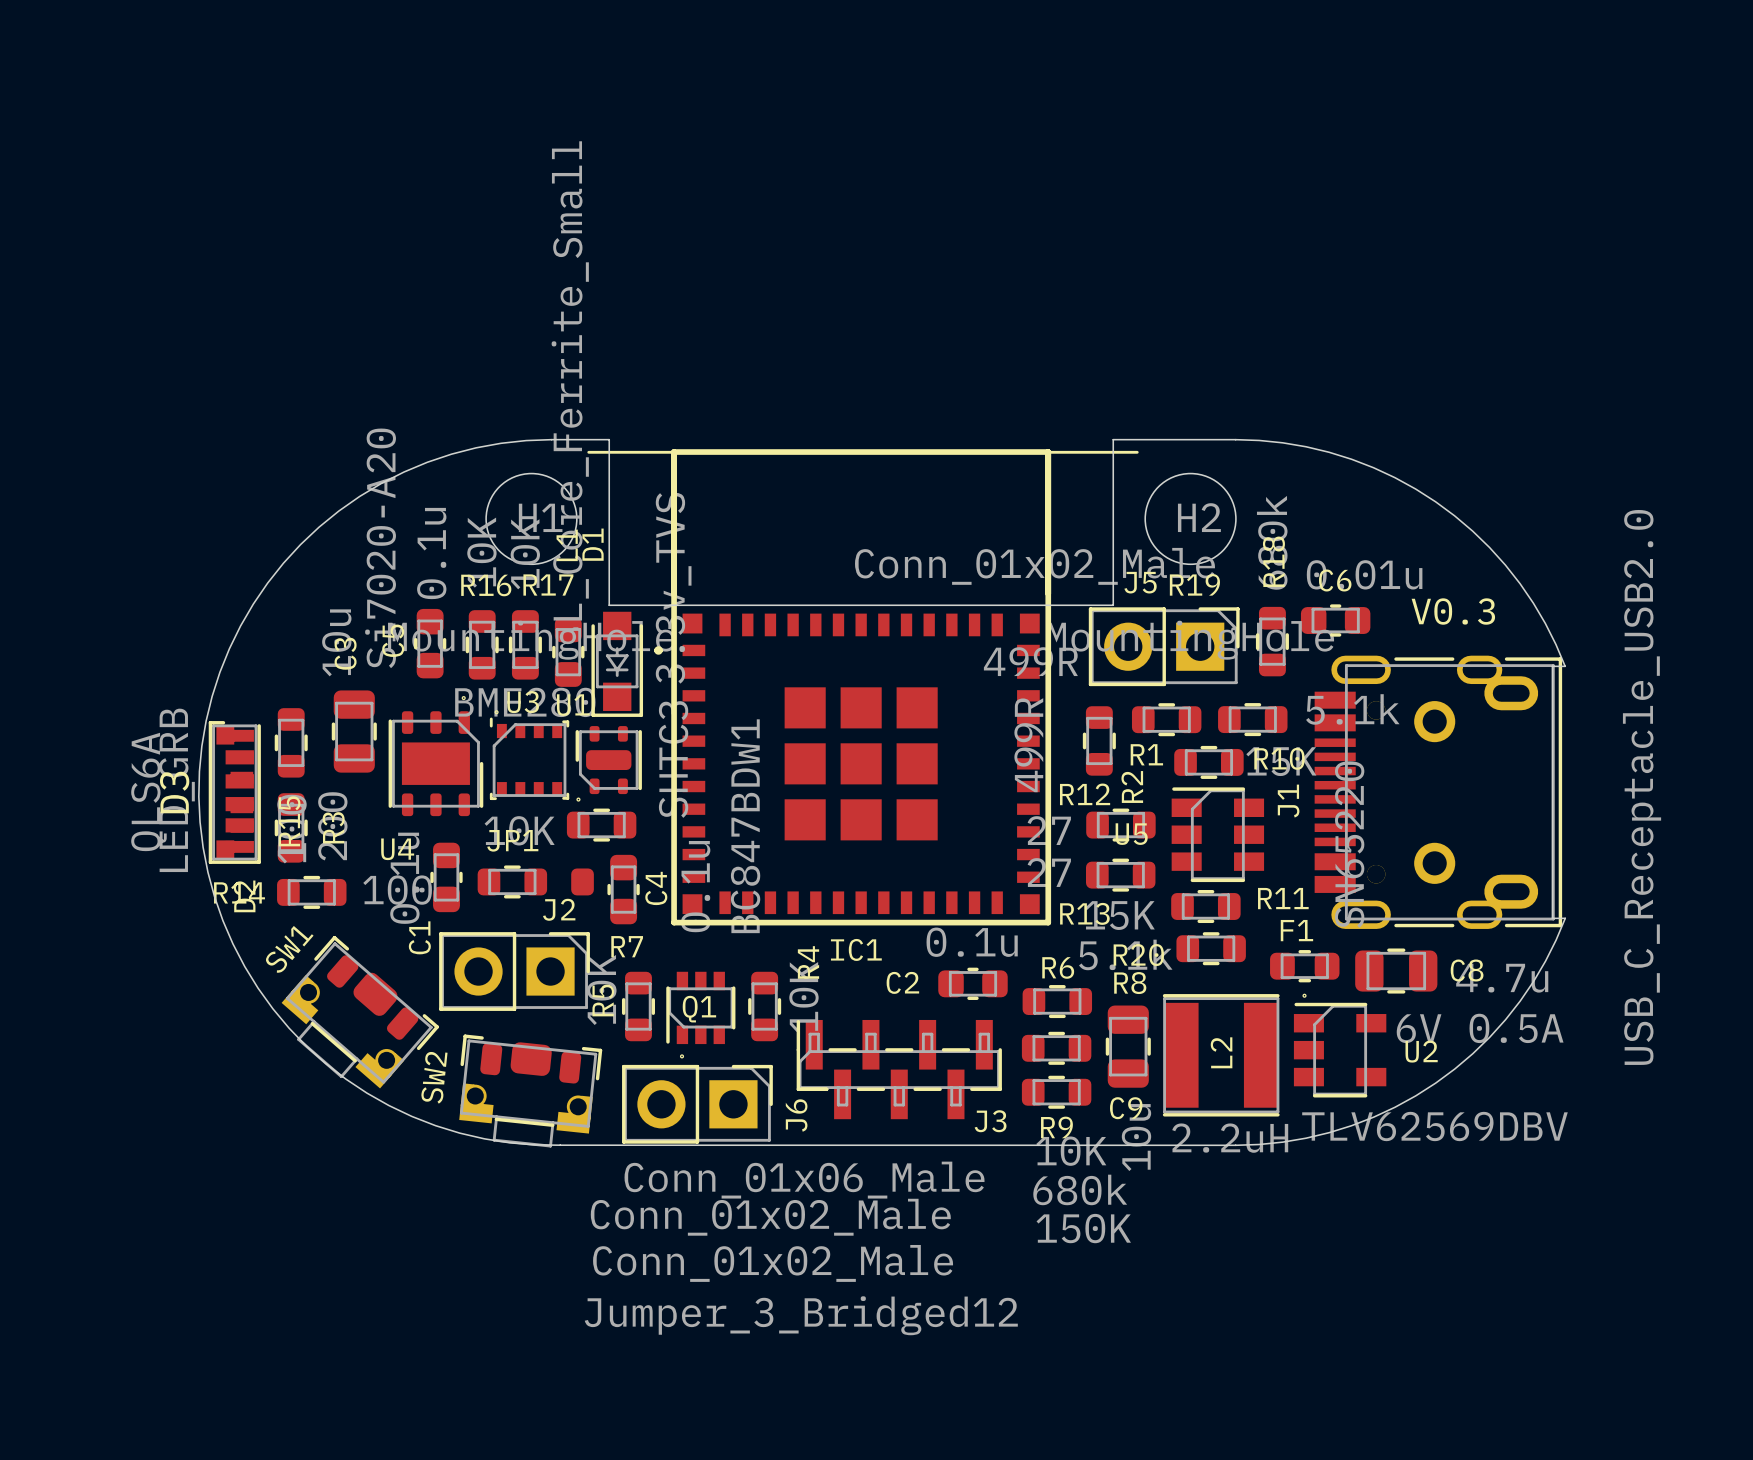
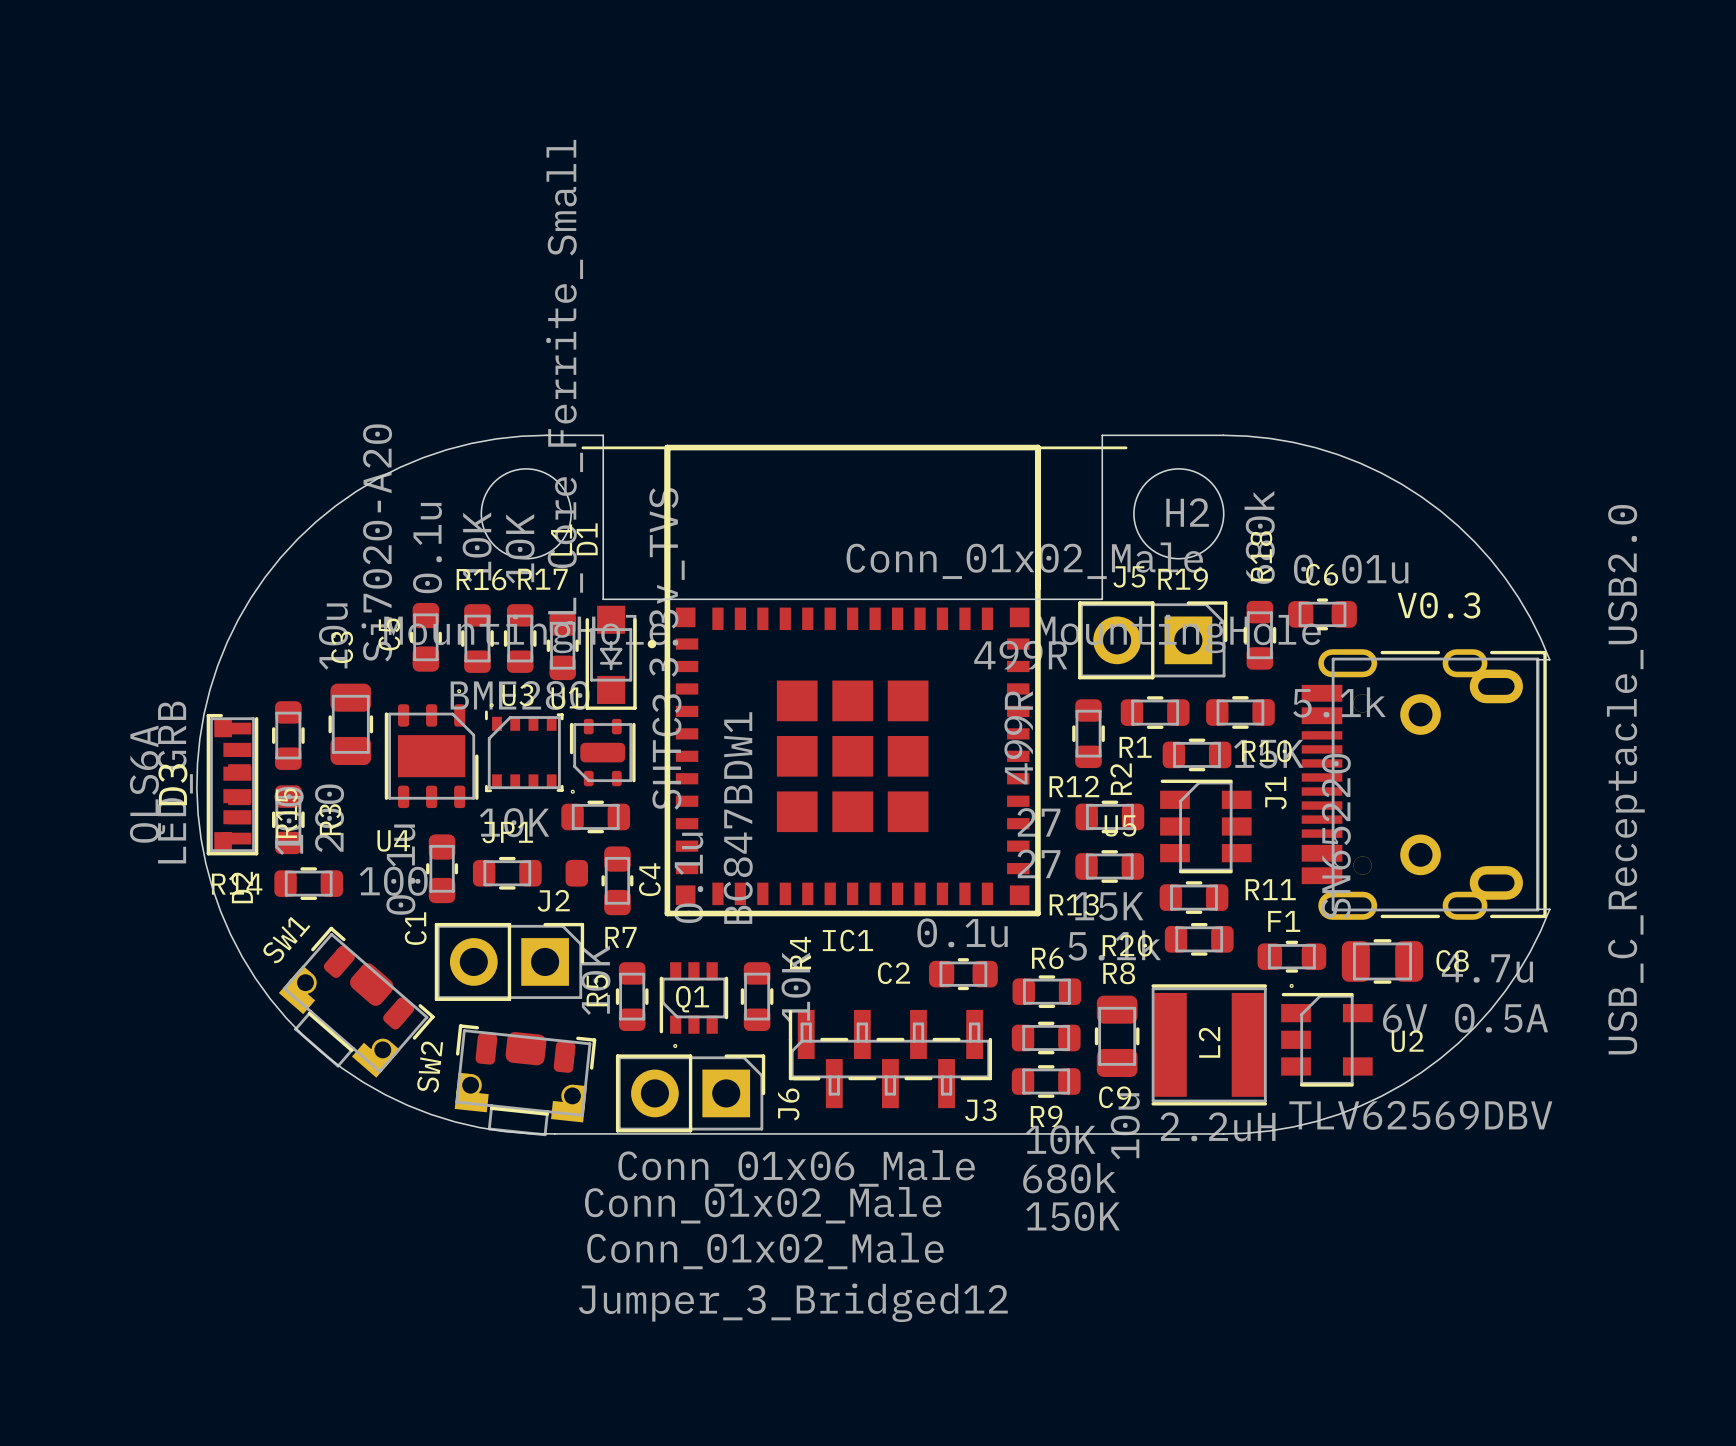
H1 name: H1 (540, 517) -> none

